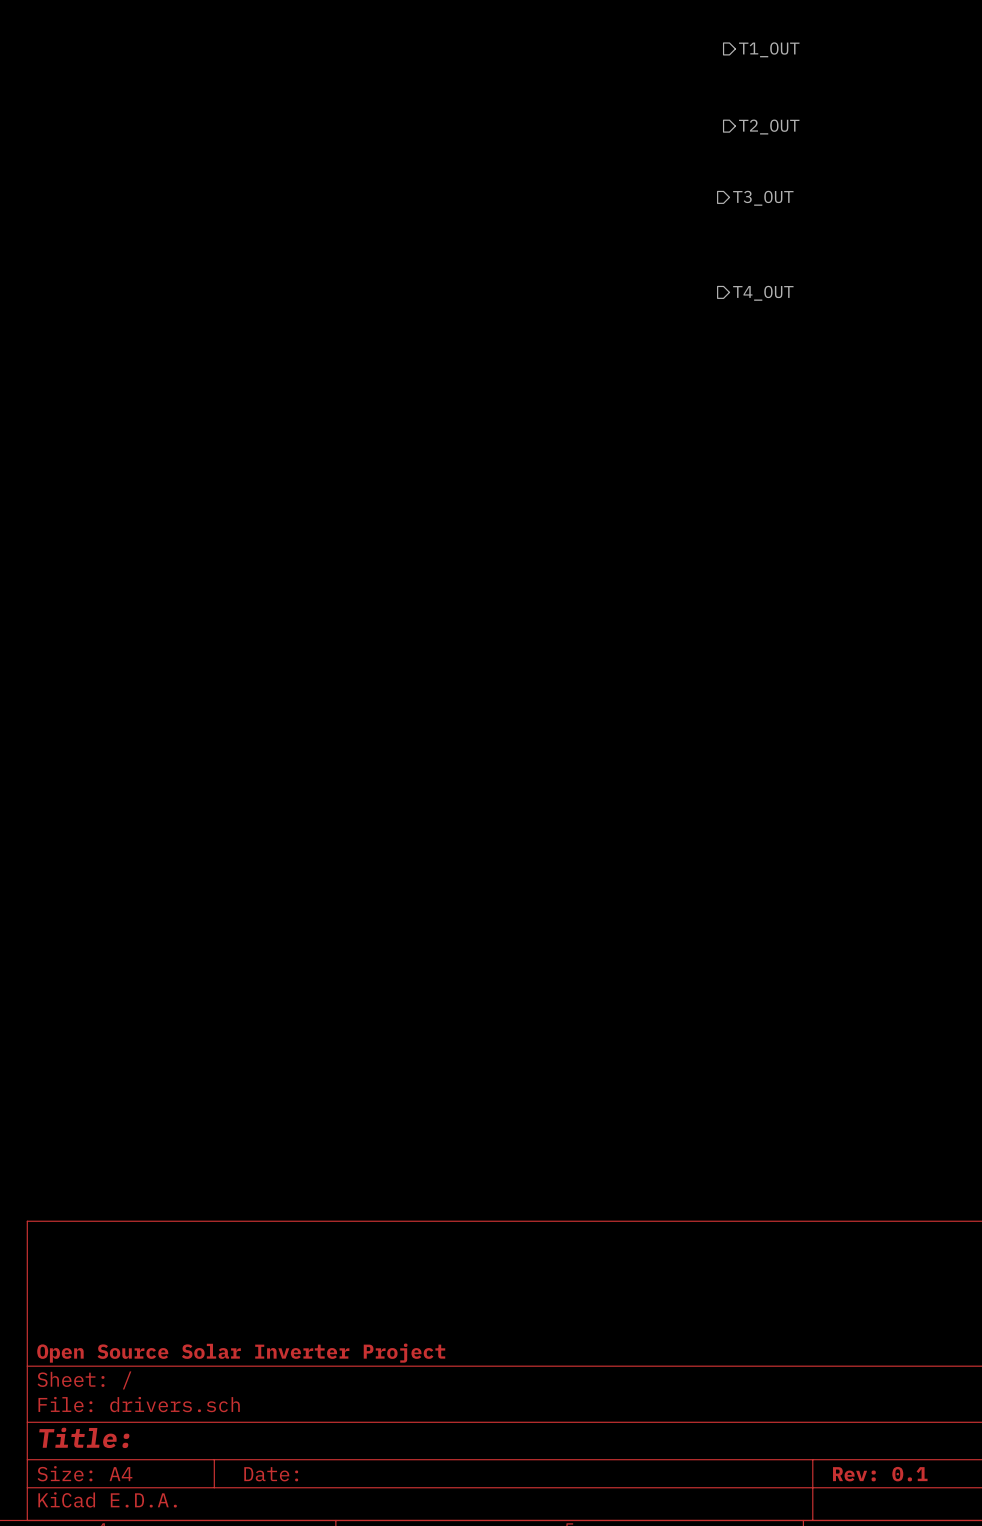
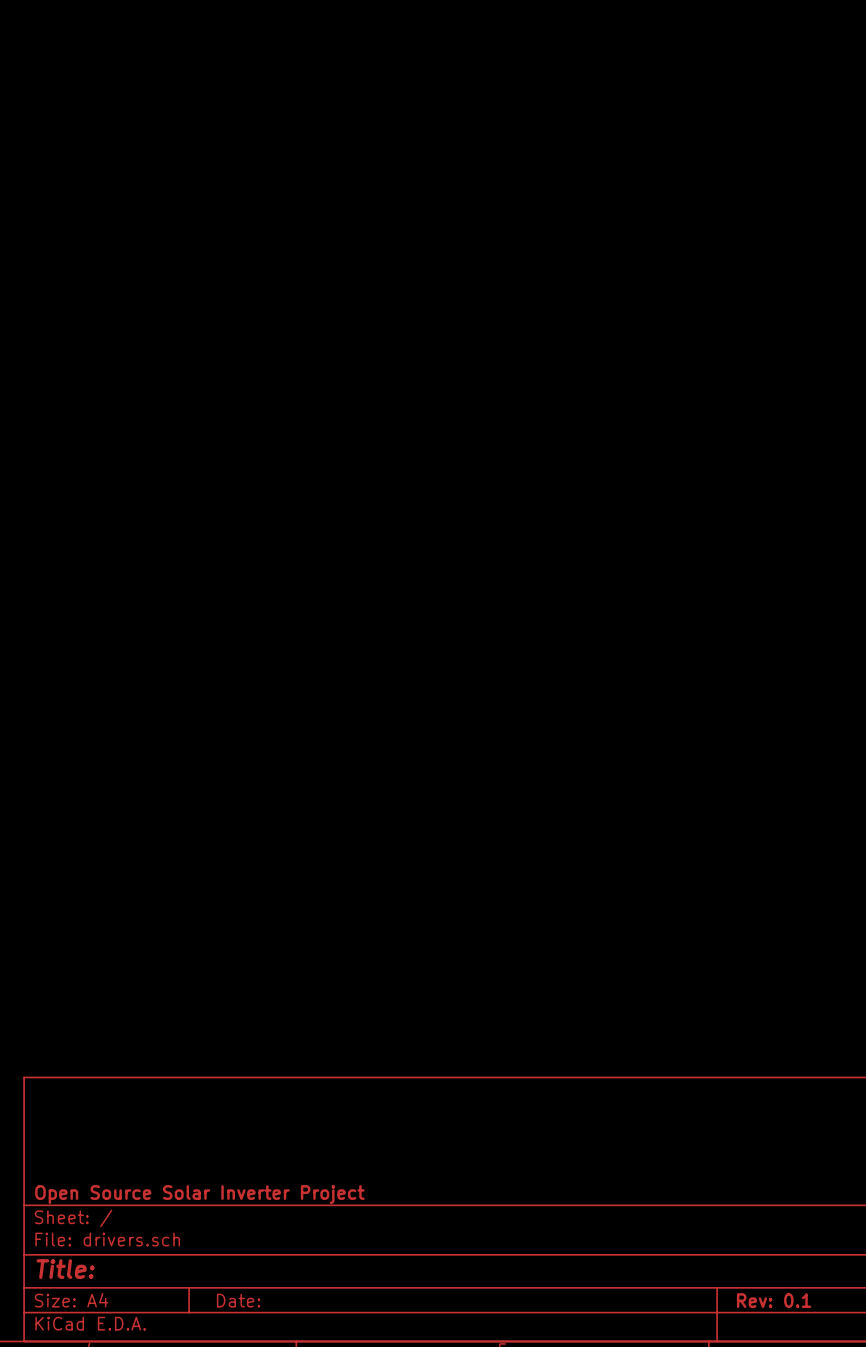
hierarchical label: T1_OUT (769, 49) -> none
hierarchical label: T2_OUT (769, 127) -> none
hierarchical label: T3_OUT (763, 198) -> none
hierarchical label: T4_OUT (763, 293) -> none

